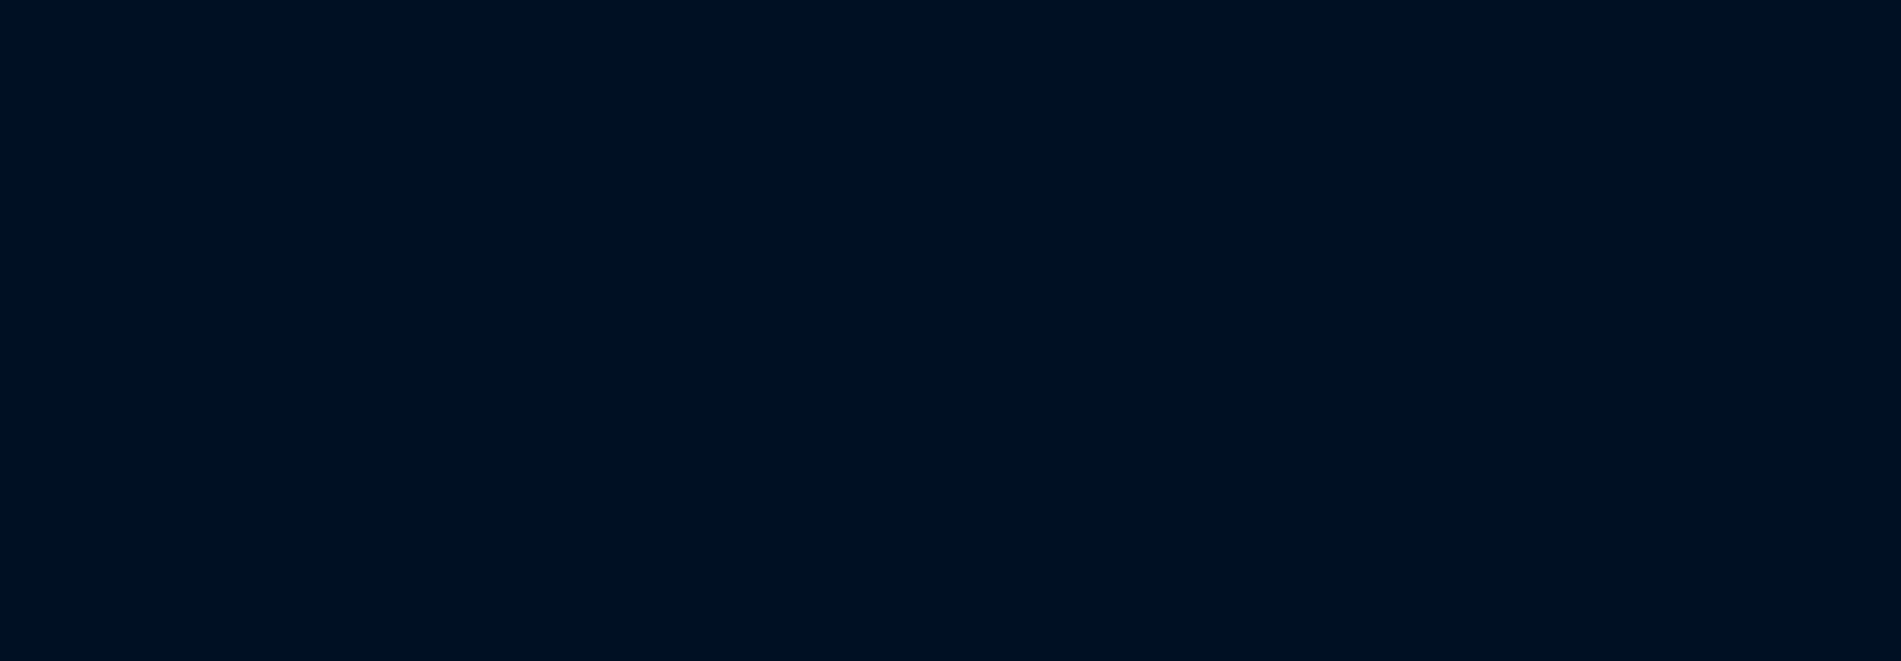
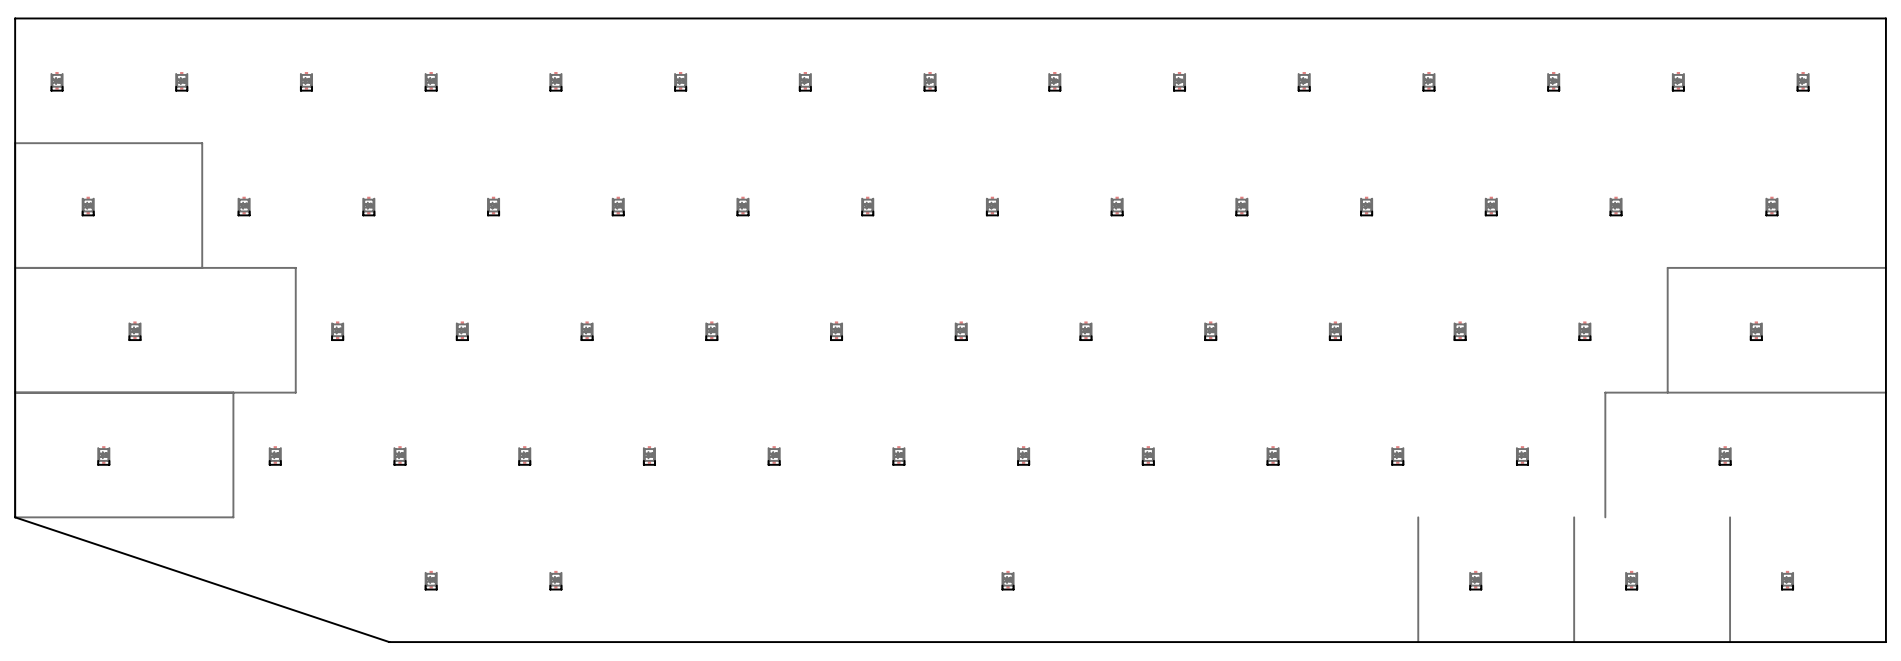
board edge: none -> (15, 18) (1885, 18) (1885, 642) (389, 642) (15, 517) (15, 18)
part: none -> (57, 81)
part: none -> (181, 81)
part: none -> (306, 81)
part: none -> (431, 81)
part: none -> (555, 81)
part: none -> (680, 81)
part: none -> (805, 81)
part: none -> (930, 81)
part: none -> (1054, 81)
part: none -> (1179, 81)
part: none -> (1304, 81)
part: none -> (1428, 81)
part: none -> (1553, 81)
part: none -> (1678, 81)
part: none -> (1803, 81)
part: none -> (88, 206)
part: none -> (244, 206)
part: none -> (368, 206)
part: none -> (493, 206)
part: none -> (618, 206)
part: none -> (742, 206)
part: none -> (867, 206)
part: none -> (992, 206)
part: none -> (1117, 206)
part: none -> (1241, 206)
part: none -> (1366, 206)
part: none -> (1491, 206)
part: none -> (1616, 206)
part: none -> (1771, 206)
line: none -> (15, 267) (295, 267) (295, 392) (15, 392)
line: none -> (202, 267) (202, 143) (15, 143) (15, 517) (233, 517) (233, 392)
line: none -> (1885, 267) (1667, 267) (1667, 392)
part: none -> (134, 330)
part: none -> (337, 330)
part: none -> (462, 330)
part: none -> (587, 330)
part: none -> (711, 330)
part: none -> (836, 330)
part: none -> (961, 330)
part: none -> (1085, 330)
part: none -> (1210, 330)
part: none -> (1335, 330)
part: none -> (1460, 330)
part: none -> (1584, 330)
part: none -> (1756, 330)
line: none -> (1885, 392) (1605, 392) (1605, 517)
part: none -> (103, 455)
part: none -> (275, 455)
part: none -> (400, 455)
part: none -> (524, 455)
part: none -> (649, 455)
part: none -> (774, 455)
part: none -> (898, 455)
part: none -> (1023, 455)
part: none -> (1148, 455)
part: none -> (1273, 455)
part: none -> (1397, 455)
part: none -> (1522, 455)
part: none -> (1725, 455)
line: none -> (1418, 517) (1418, 642)
line: none -> (1574, 517) (1574, 642)
line: none -> (1730, 517) (1730, 642)
part: none -> (431, 580)
part: none -> (555, 580)
part: none -> (1008, 580)
part: none -> (1475, 580)
part: none -> (1631, 580)
part: none -> (1787, 580)

